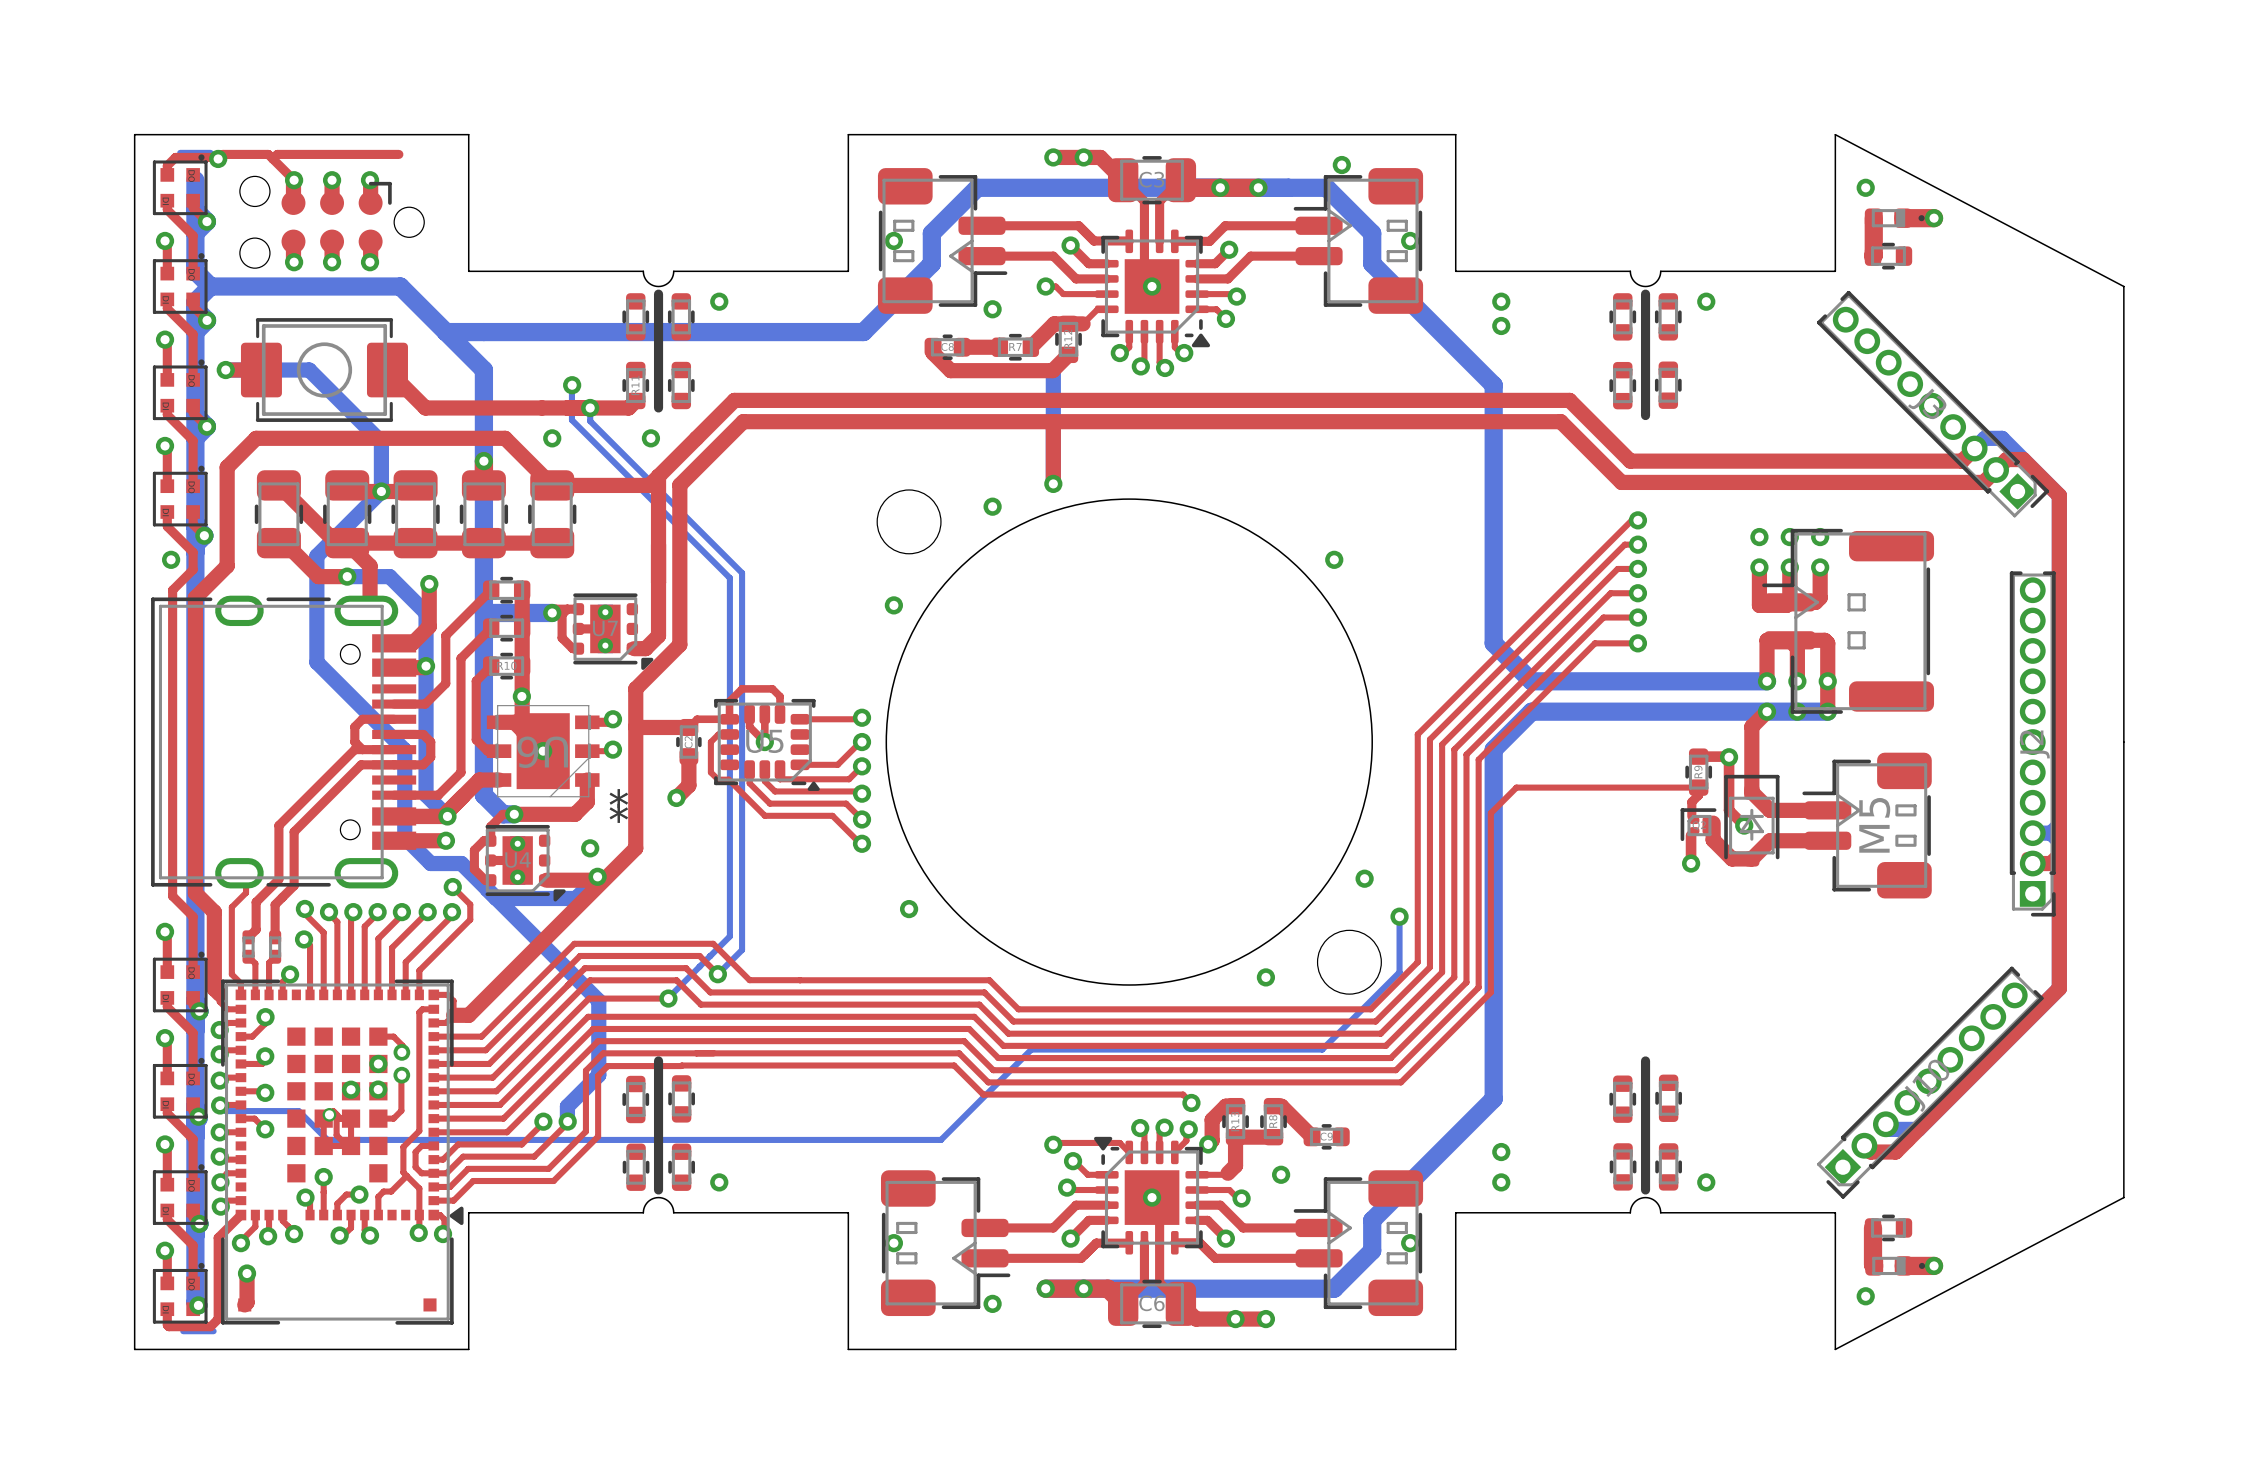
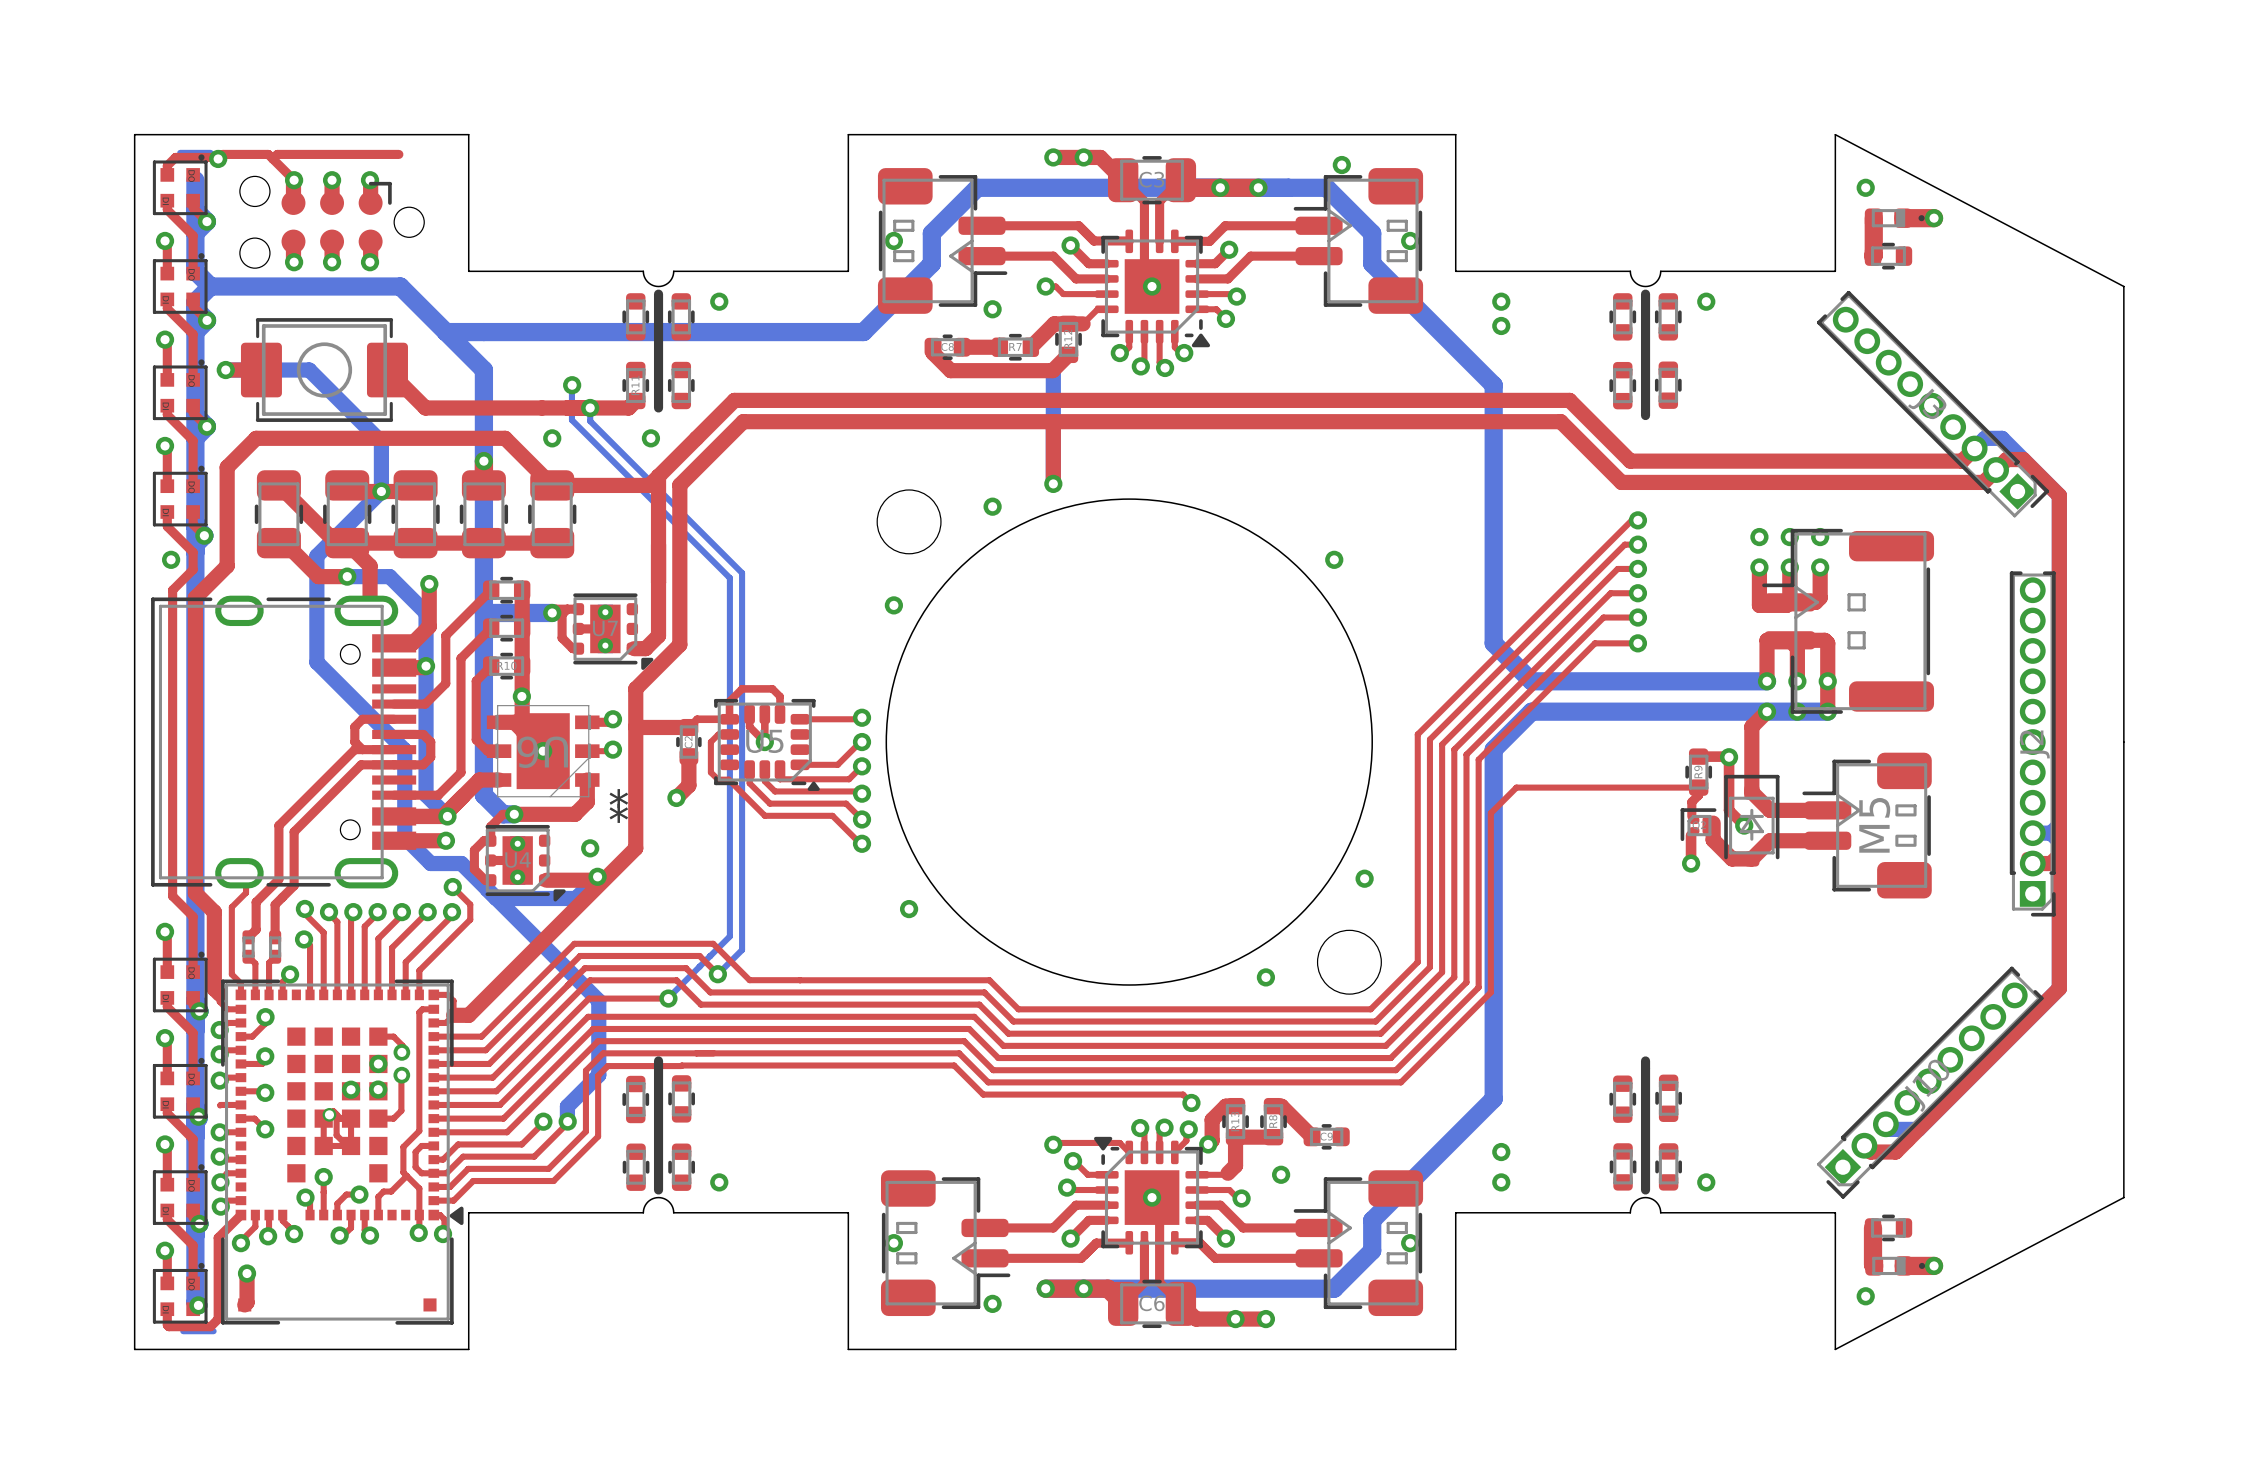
bottom track: (1399, 916) (1399, 972) (1322, 1049) (1031, 1049) (940, 1139) (327, 1139) (298, 1111) (225, 1111) (220, 1105) -> none
via: (1399, 916) -> none
via: (220, 1105) -> none

